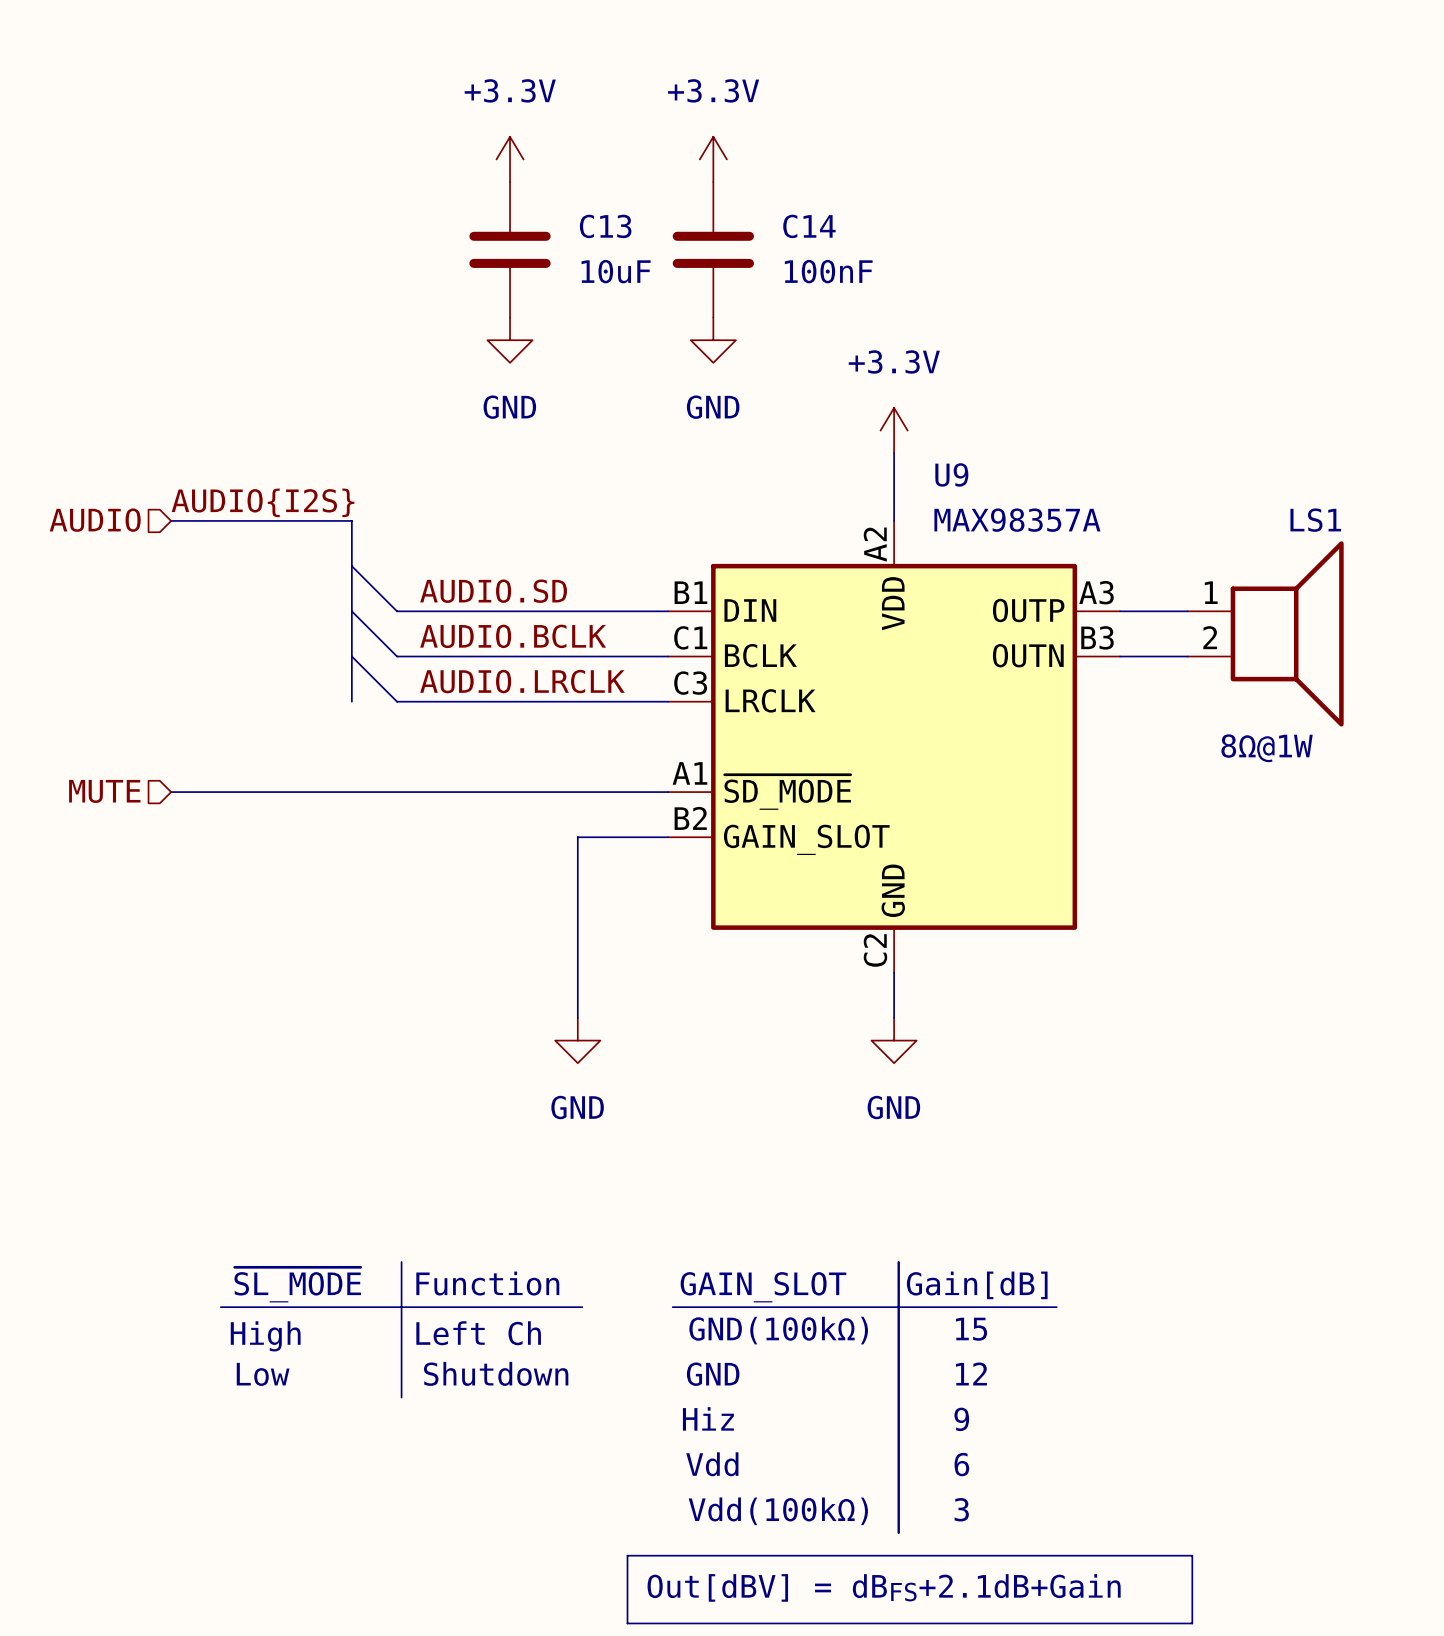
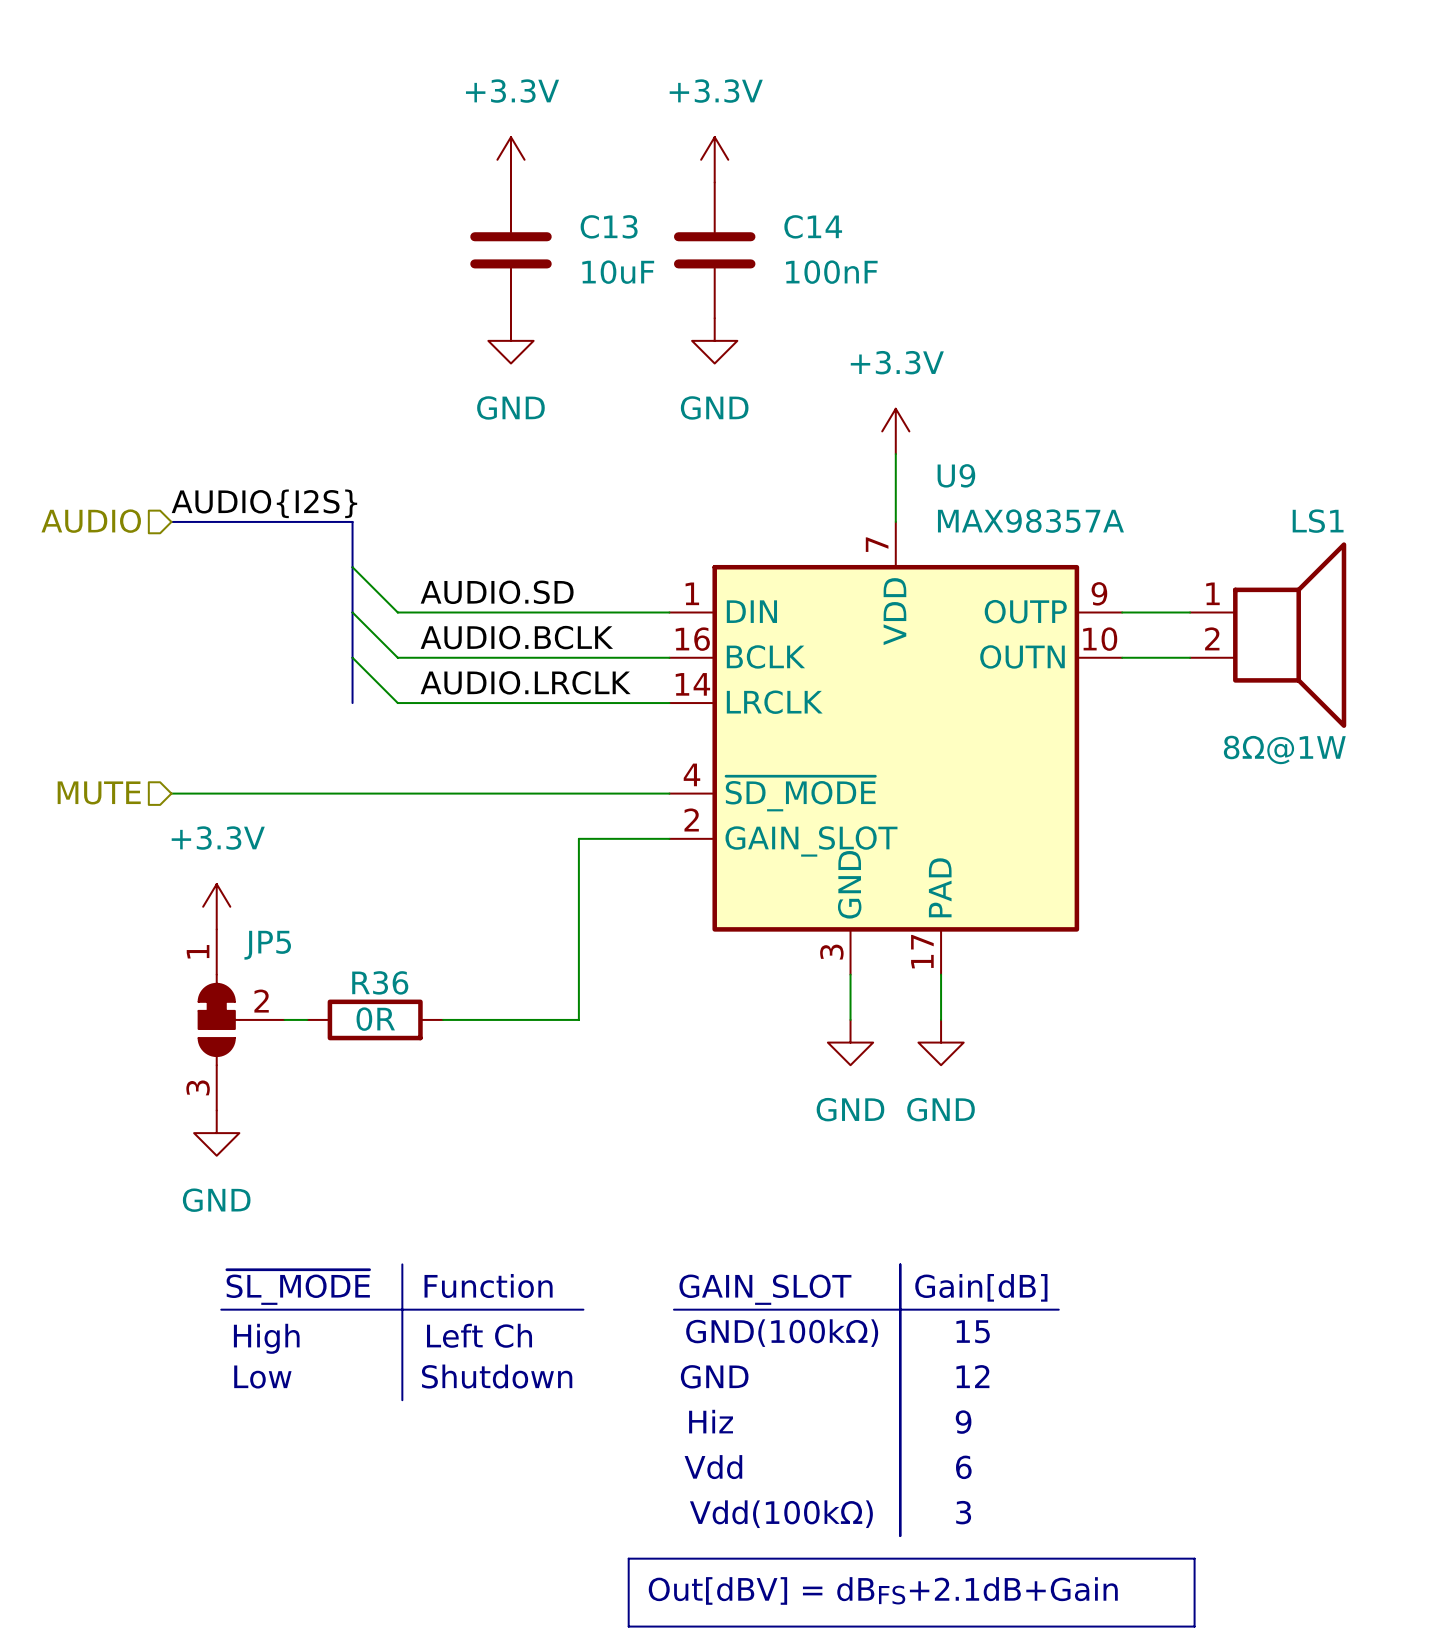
U9 symbol: [668, 520, 1121, 973] -> [669, 521, 1123, 975]
power symbol: none -> +3.3V (216, 906)
wire: (894, 972) (894, 1017) -> (850, 974) (850, 1019)
wire: none -> (941, 974) (941, 1019)
JP5: none -> (241, 1019)
wire: none -> (284, 1019) (307, 1019)
R36: none -> 0R (375, 1019)
wire: none -> (443, 1019) (578, 1019)
power symbol: GND (577, 1040) -> none
power symbol: none -> GND (850, 1042)
power symbol: GND (894, 1040) -> none
power symbol: none -> GND (941, 1042)
power symbol: none -> GND (216, 1133)

